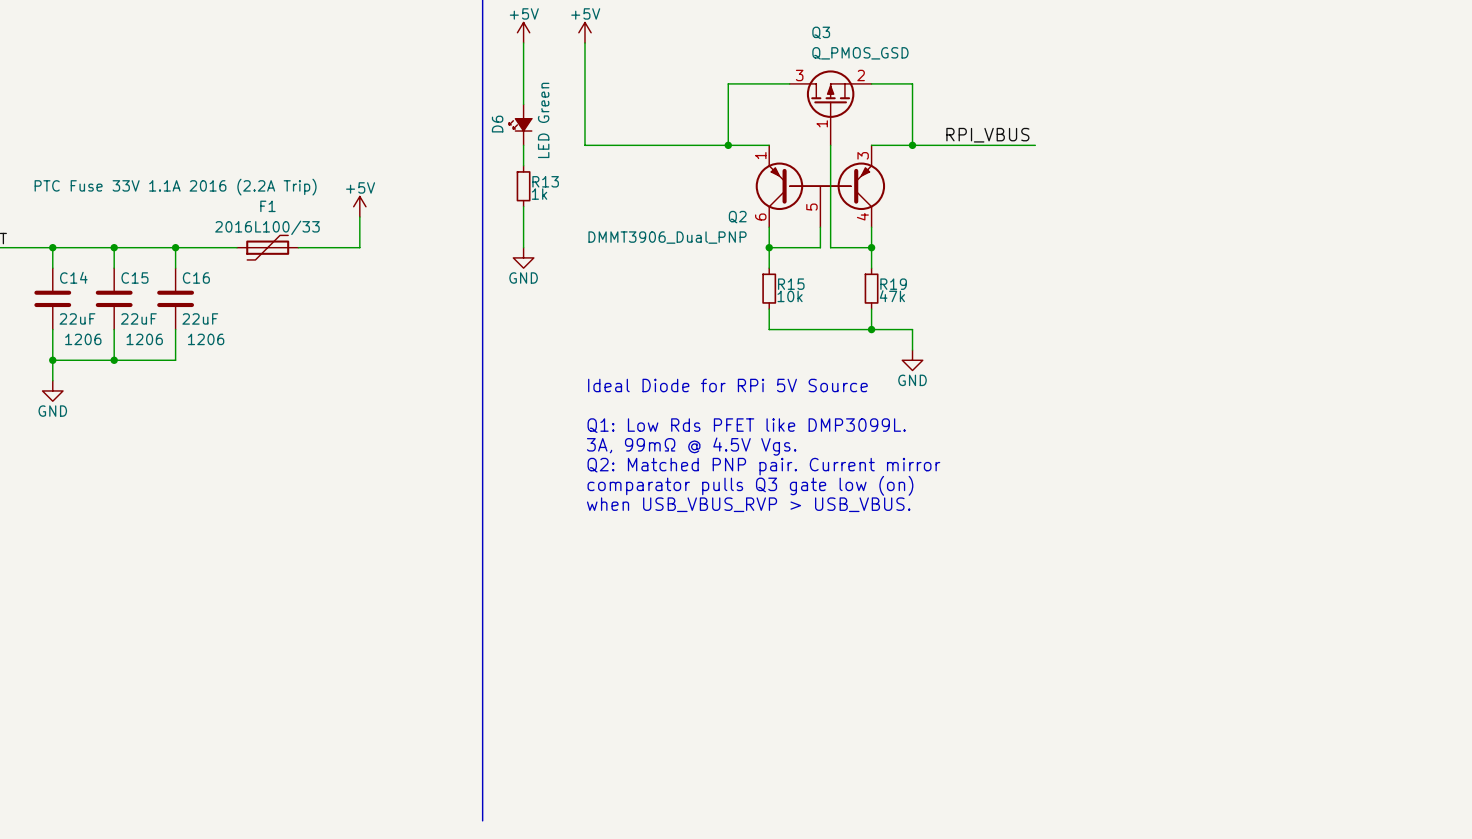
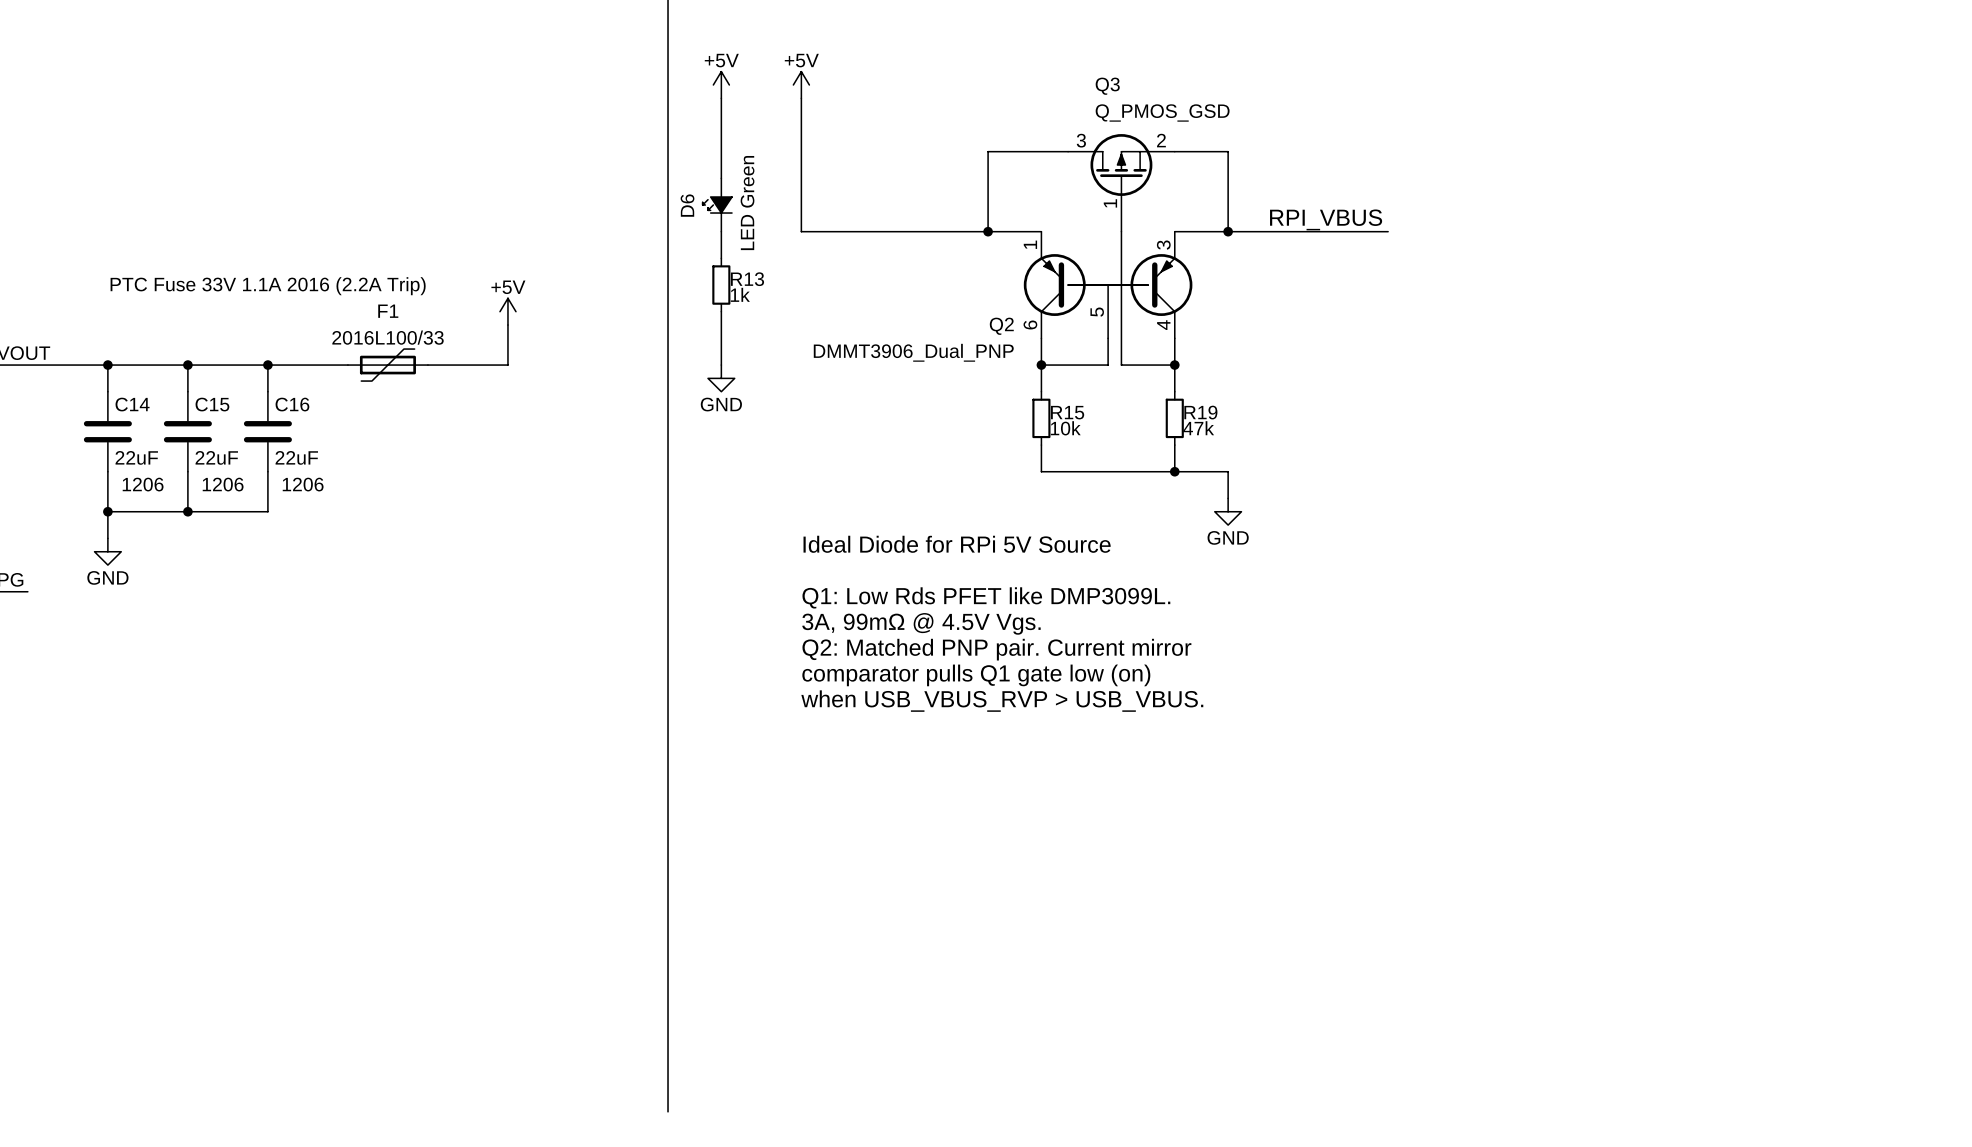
text: comparator pulls Q3 gate low (on) (750, 485) -> comparator pulls Q1 gate low (on) (976, 675)

